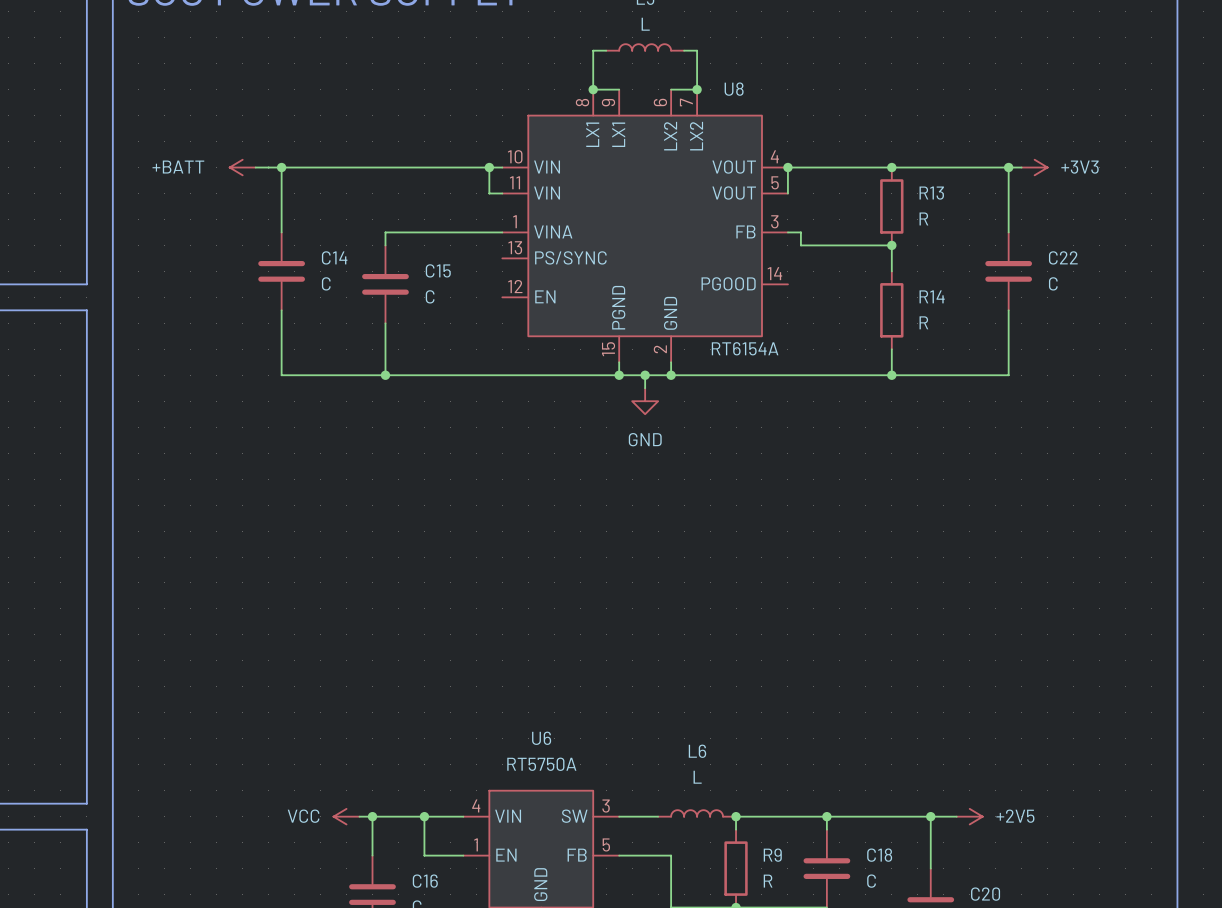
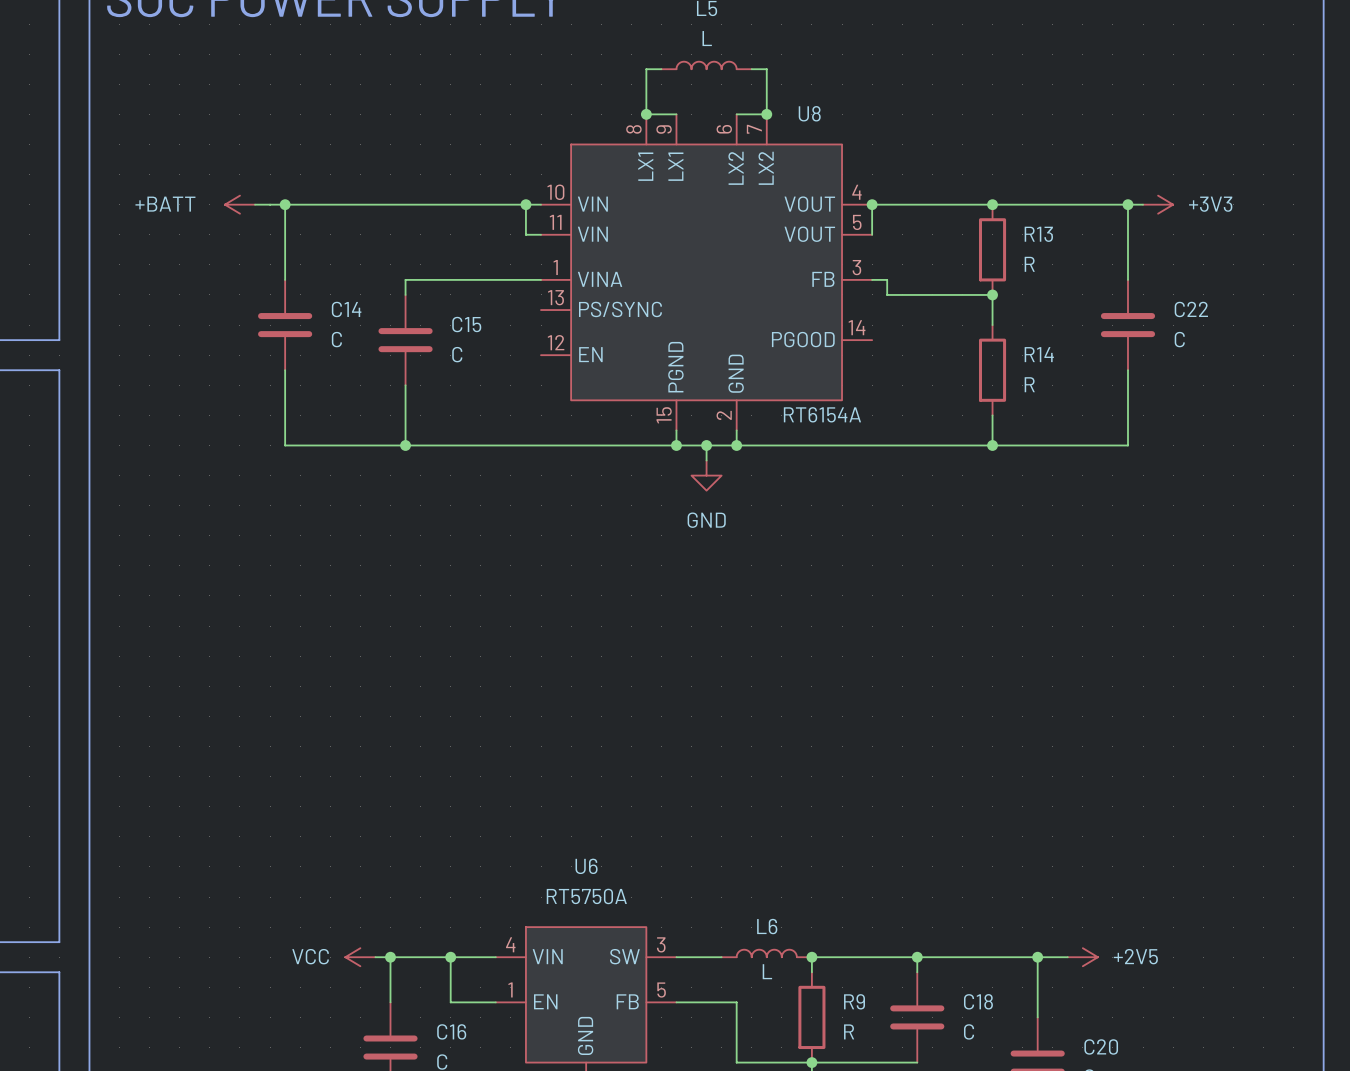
L6 name position: L6 (697, 751) -> L6 (767, 926)
L6 value position: L (697, 777) -> L (767, 971)

